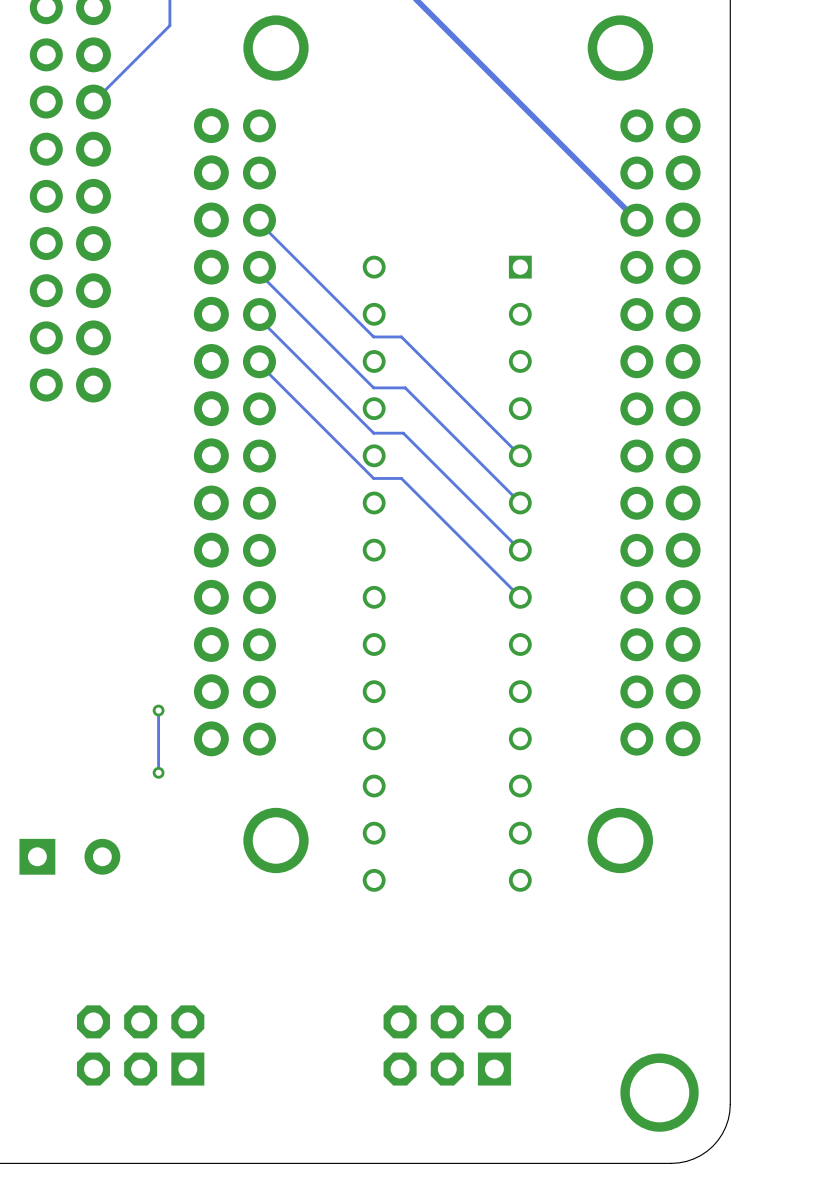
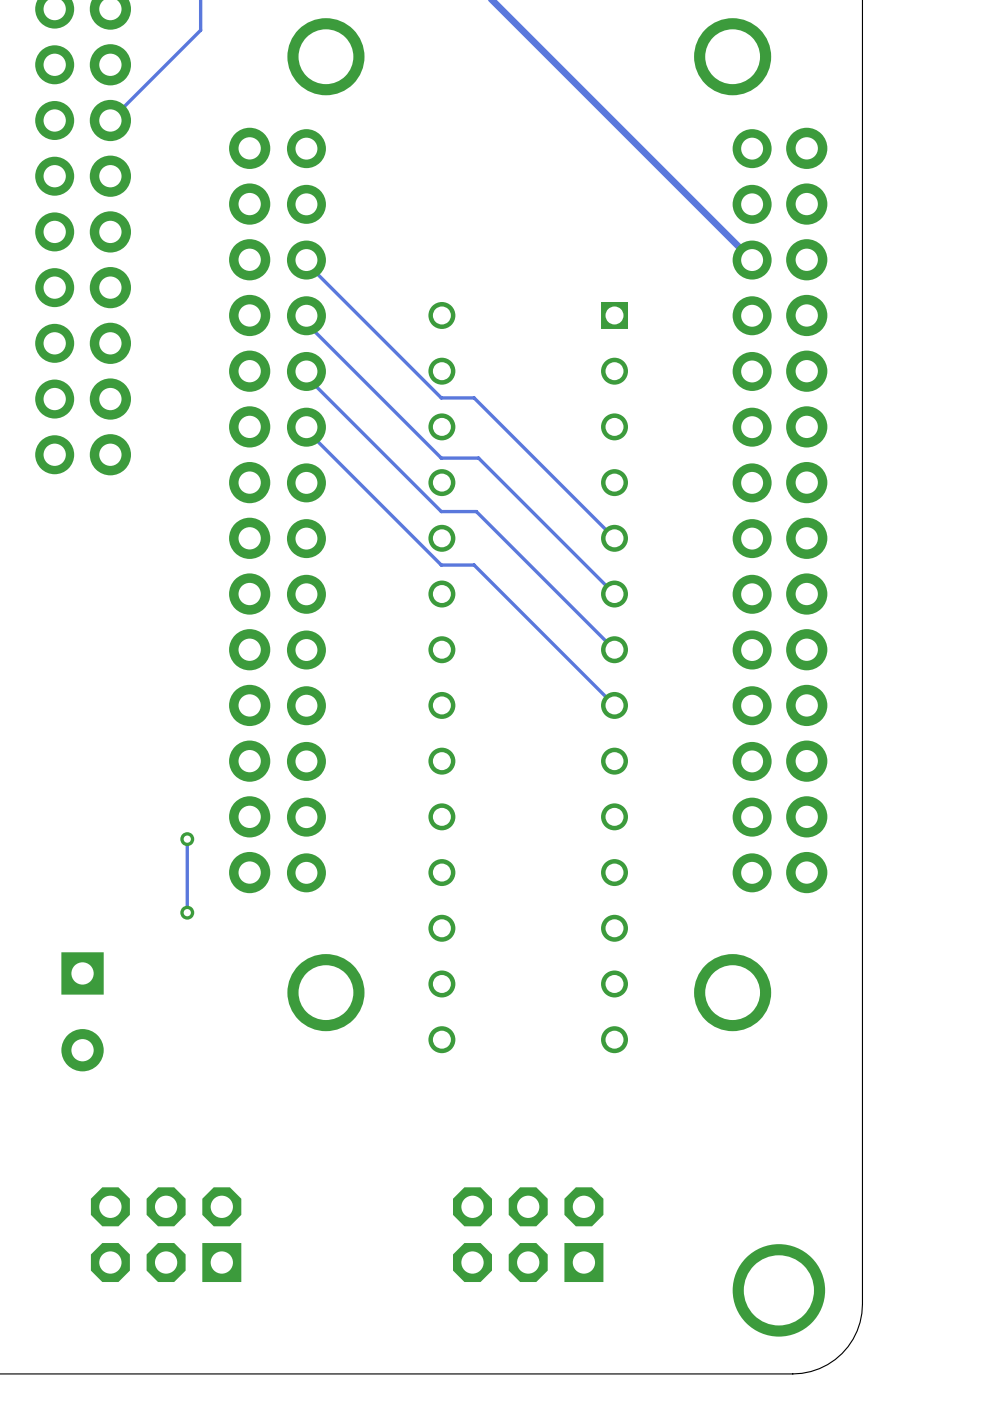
part rotation: 0° (69, 856) -> 90° clockwise (82, 1011)

